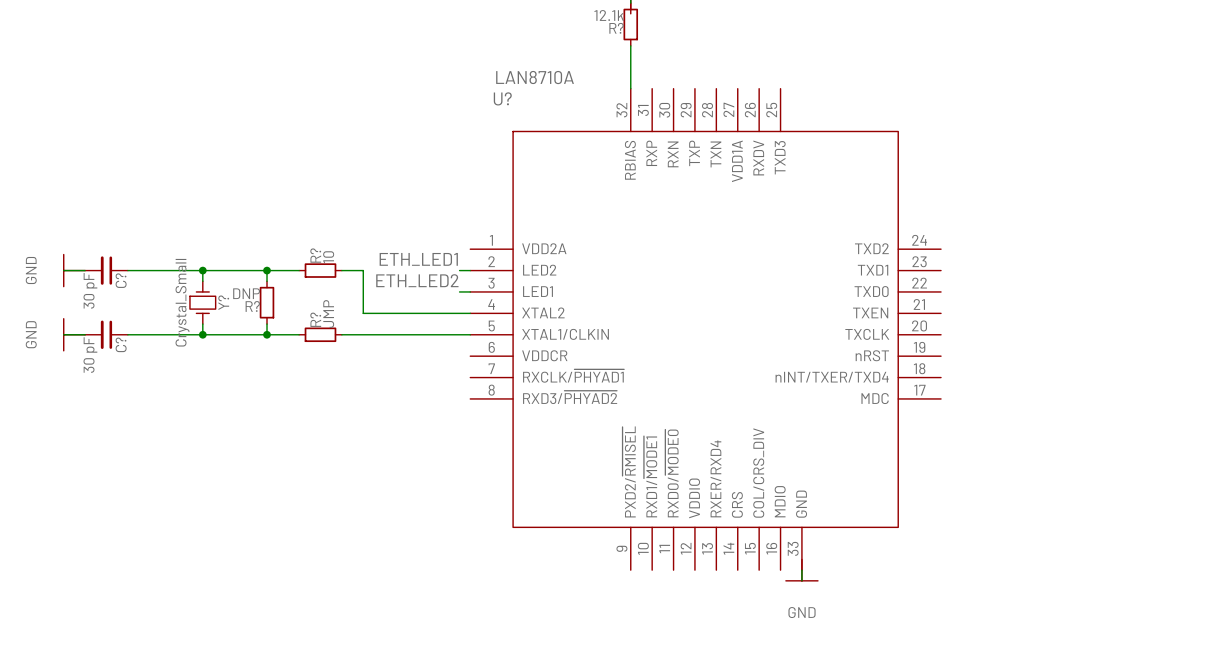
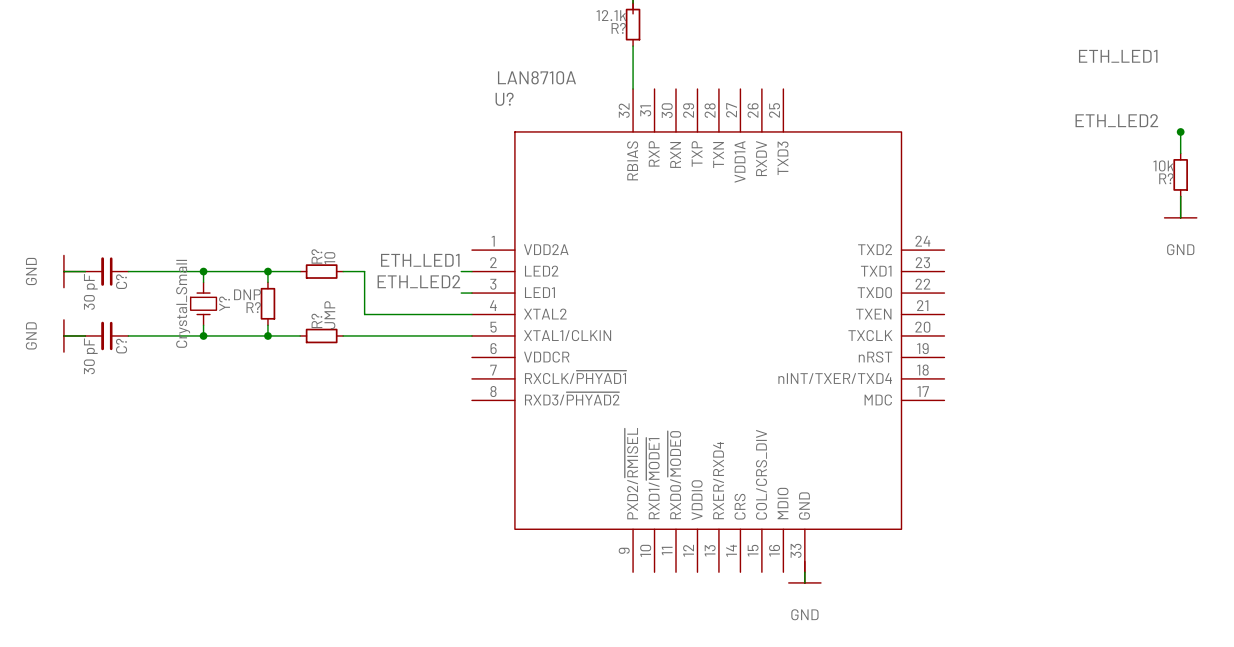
label: none -> ETH_LED1 (1118, 56)
label: none -> ETH_LED2 (1116, 120)
wire: none -> (1180, 131) (1180, 153)
junction: none -> (1180, 131)
R?: none -> 10k (1180, 174)
wire: none -> (1180, 196) (1180, 217)
power symbol: none -> GND (1180, 207)

